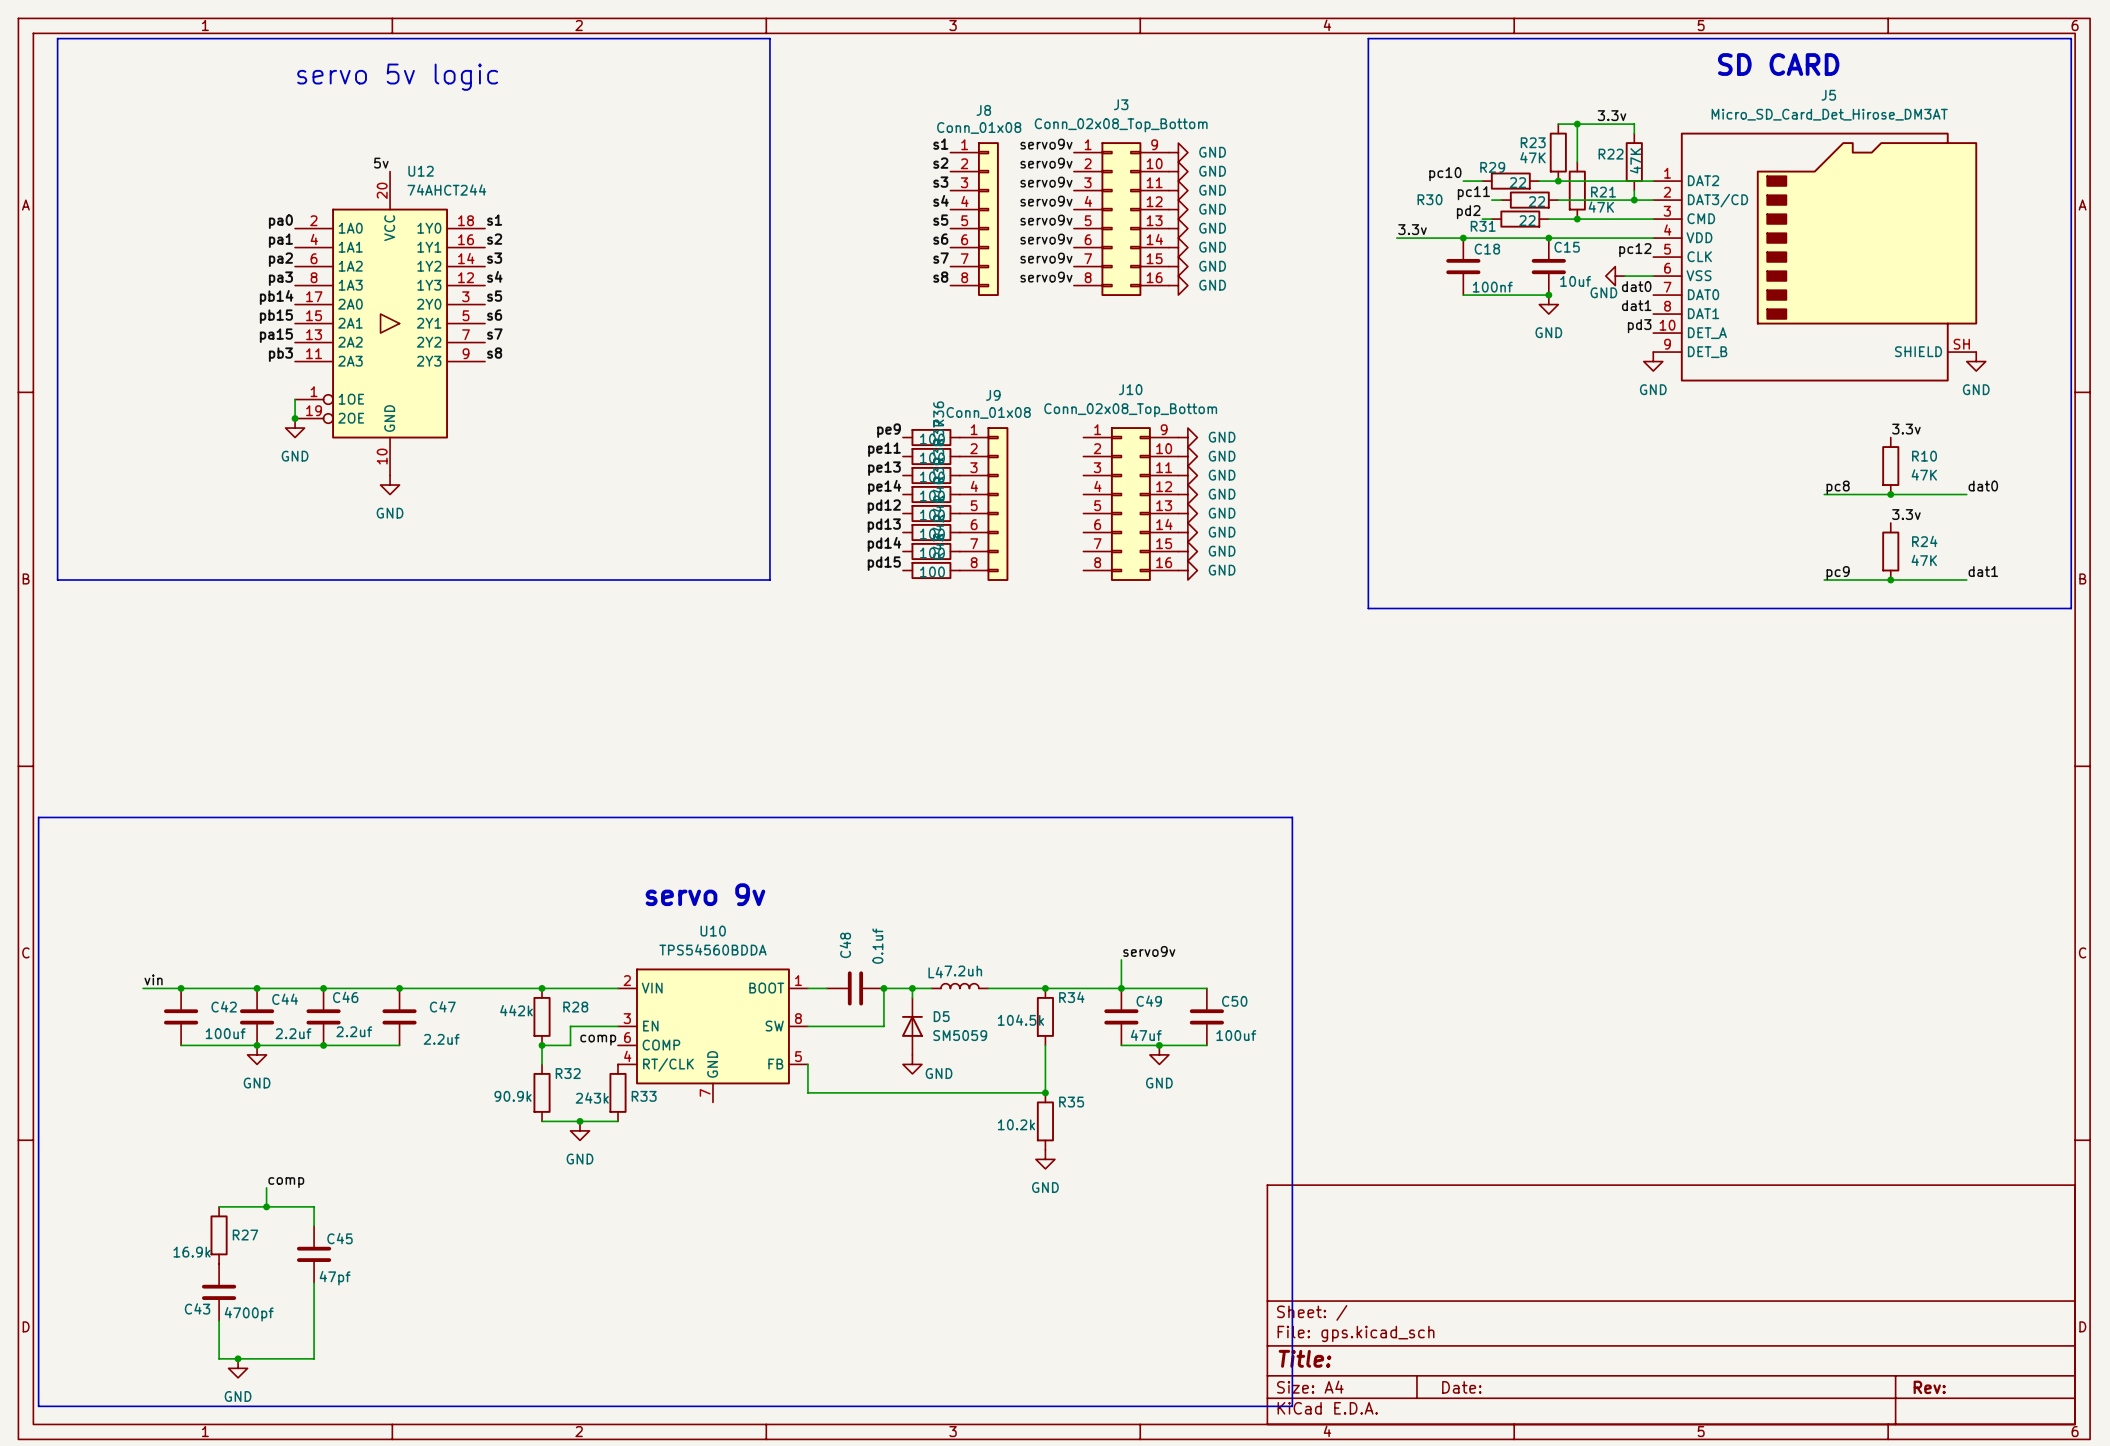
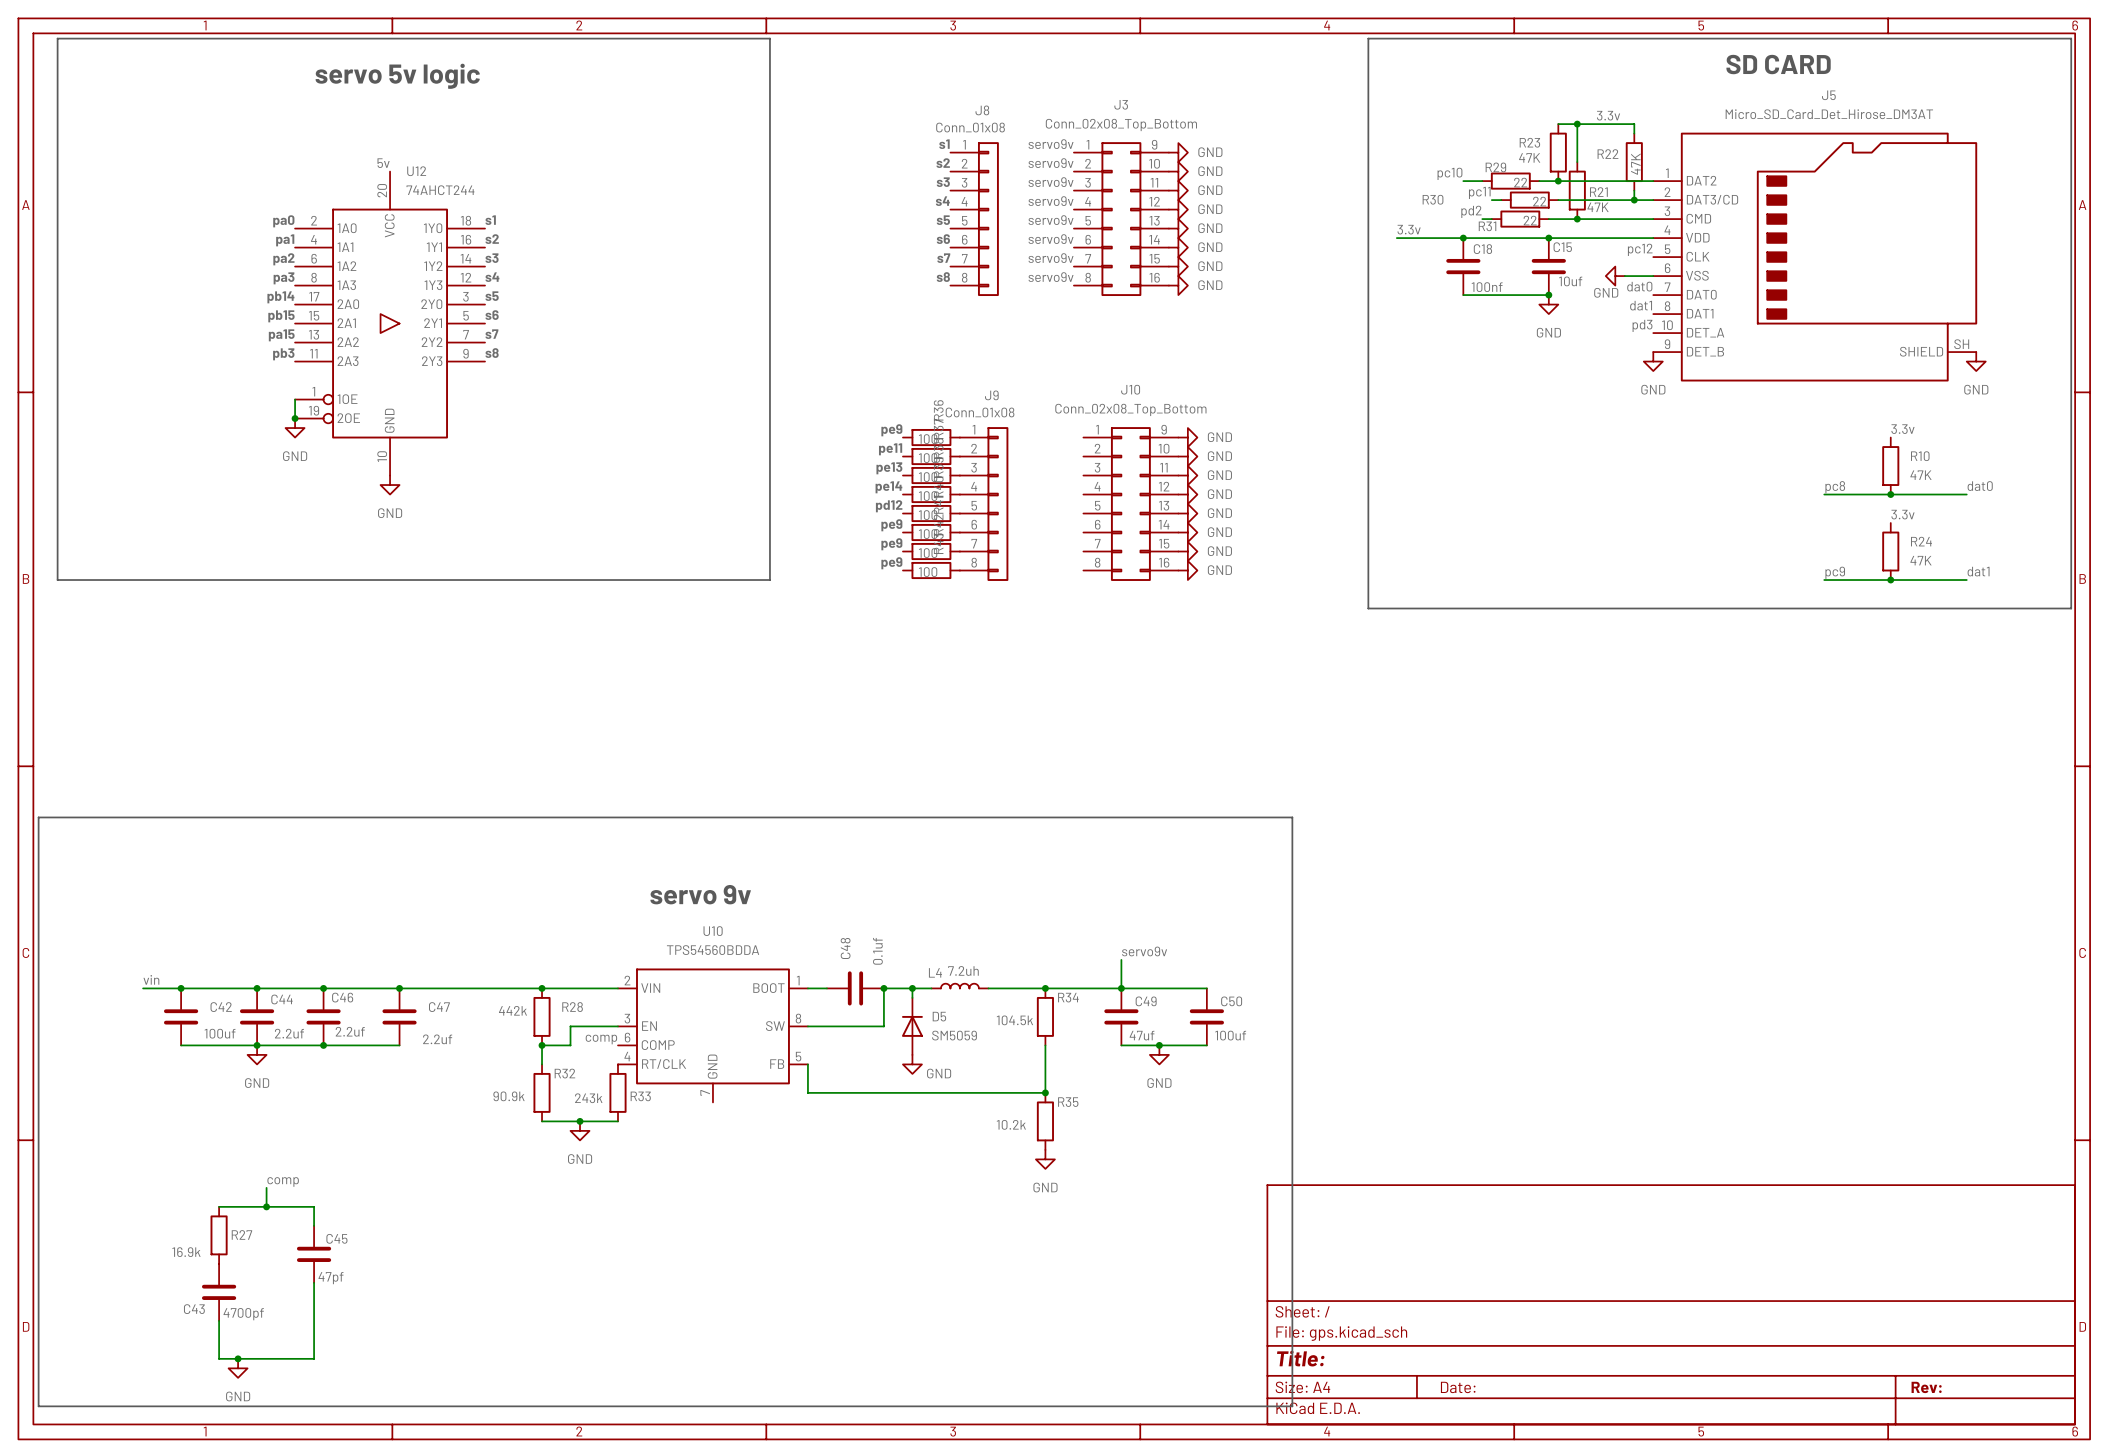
label: pd13 (884, 525) -> pe9 (891, 525)
label: pd14 (884, 544) -> pe9 (891, 544)
label: pd15 (884, 563) -> pe9 (891, 563)

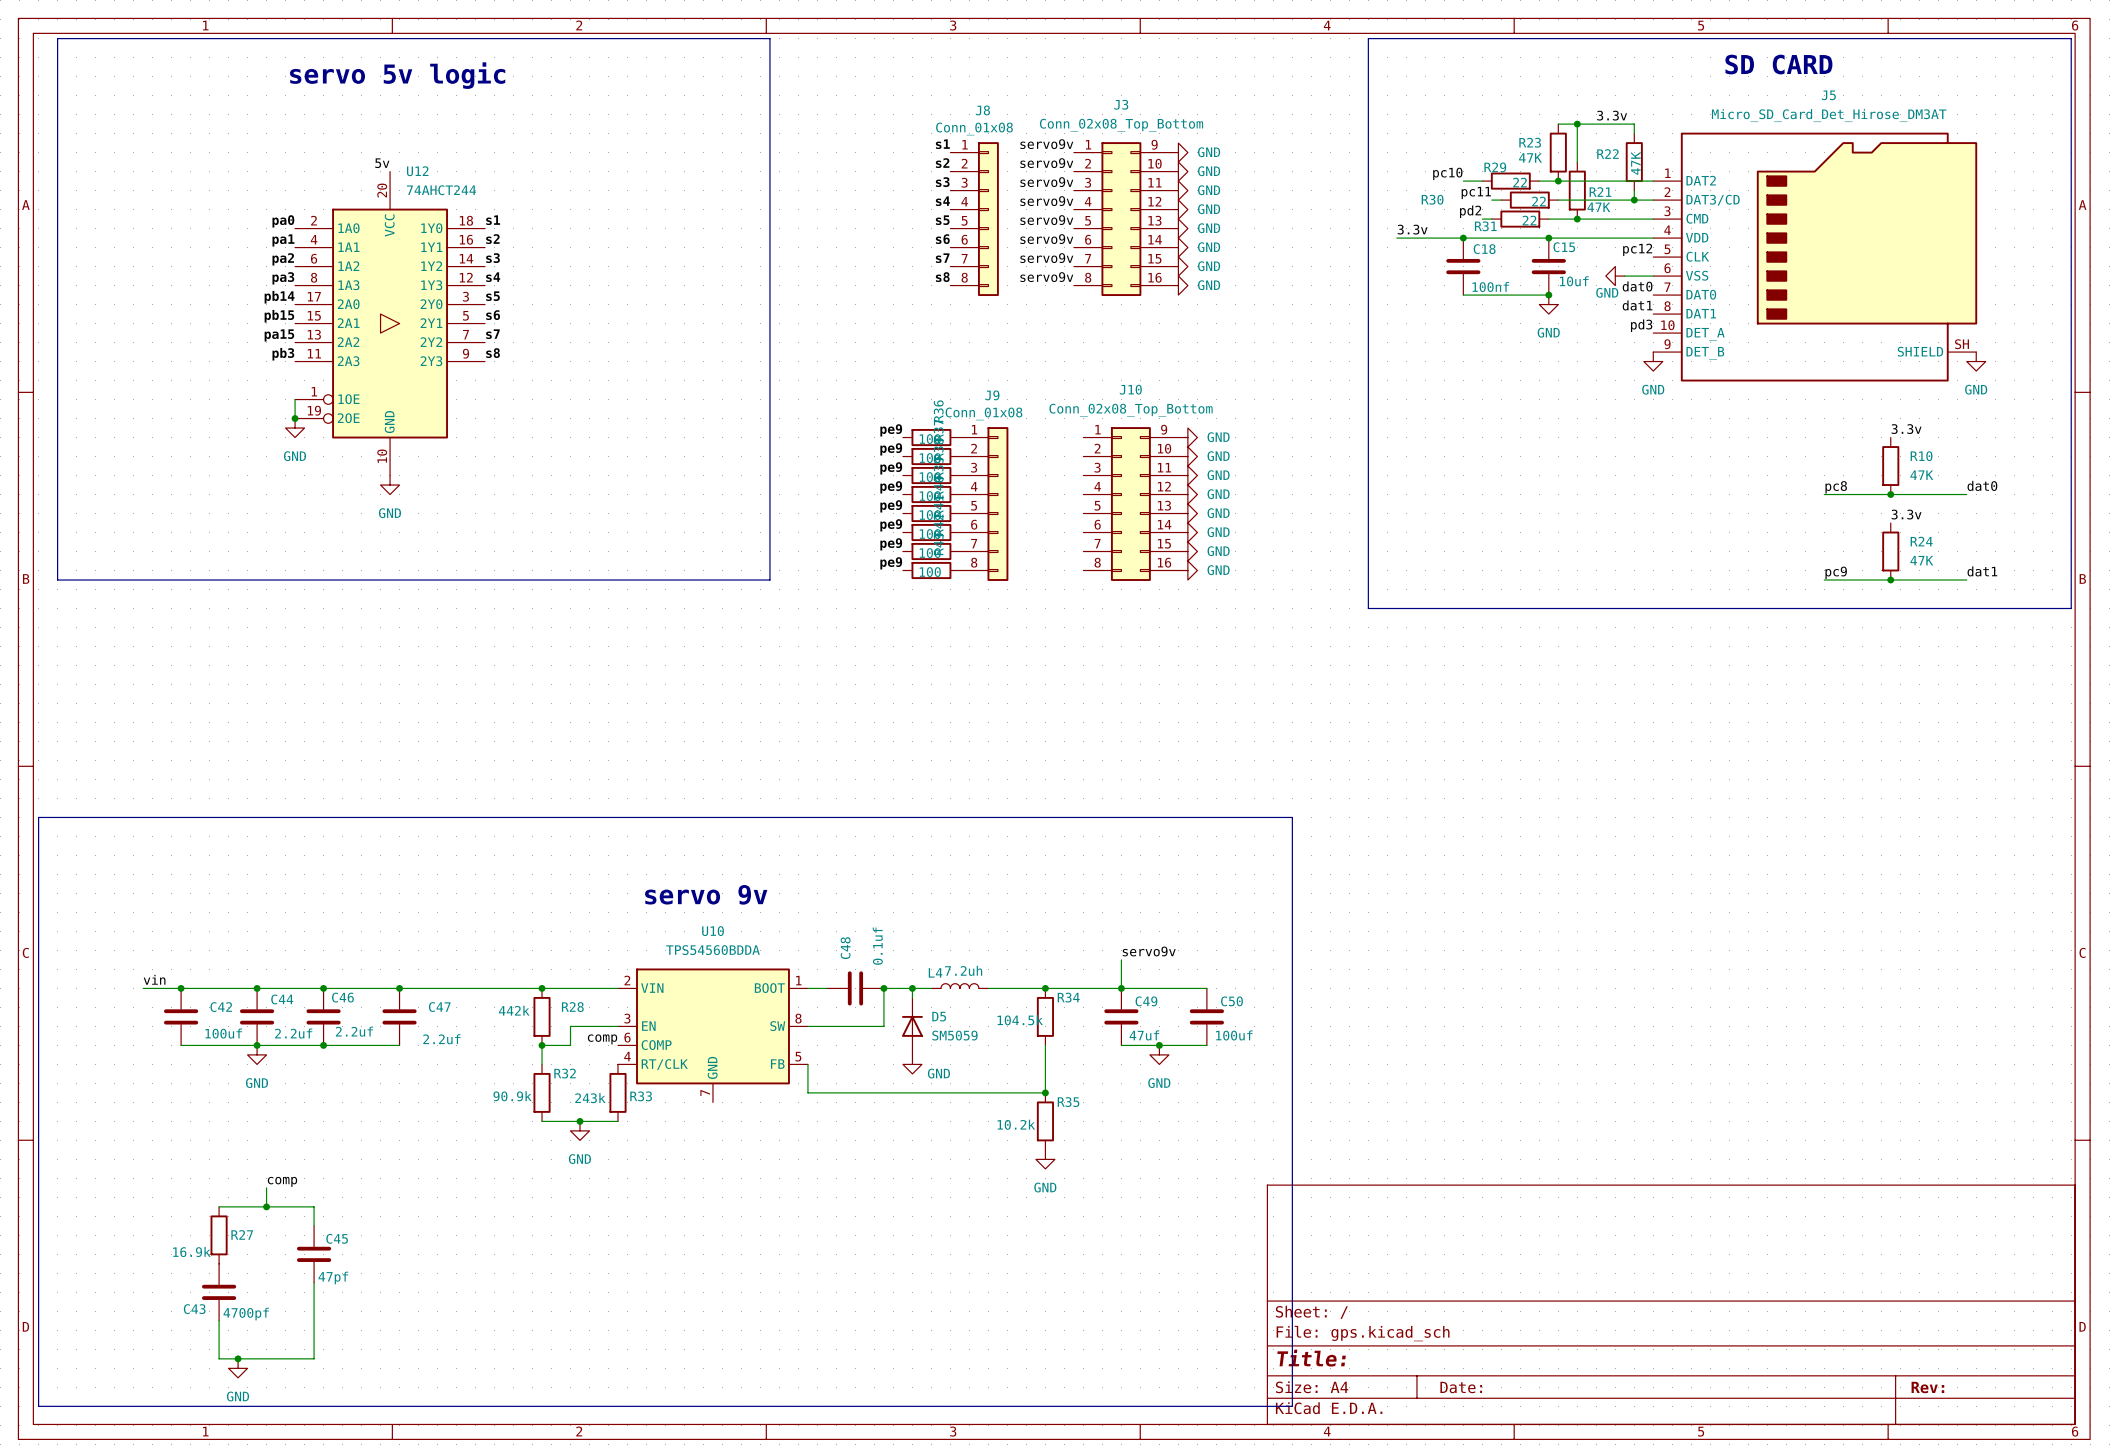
label: pe11 (890, 449) -> pe9 (891, 449)
label: pe13 (889, 468) -> pe9 (891, 468)
label: pe14 (888, 487) -> pe9 (891, 487)
label: pd12 (889, 506) -> pe9 (891, 506)

